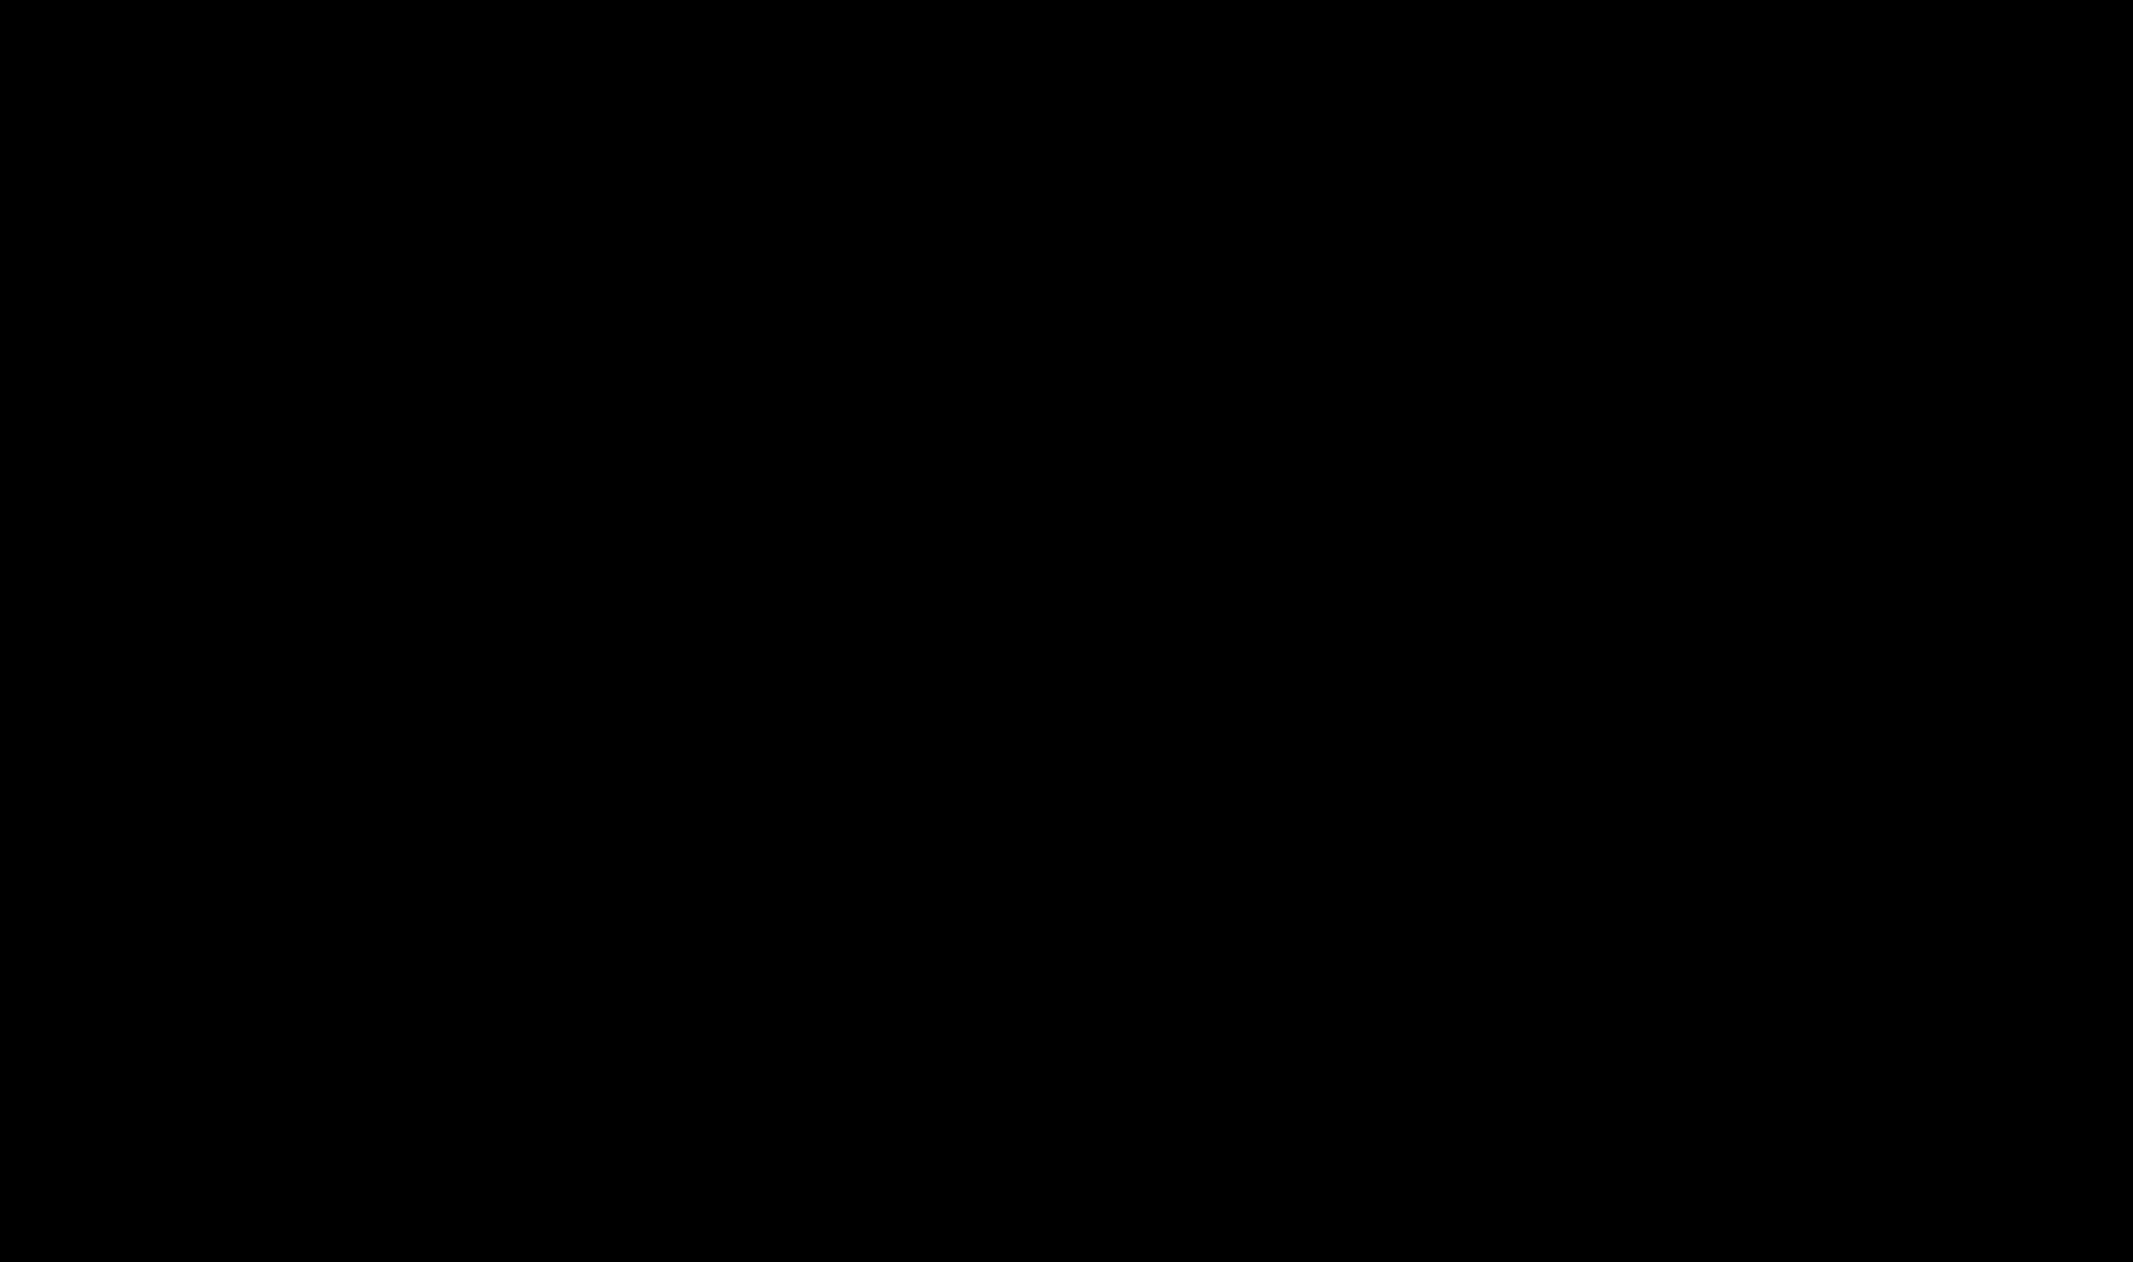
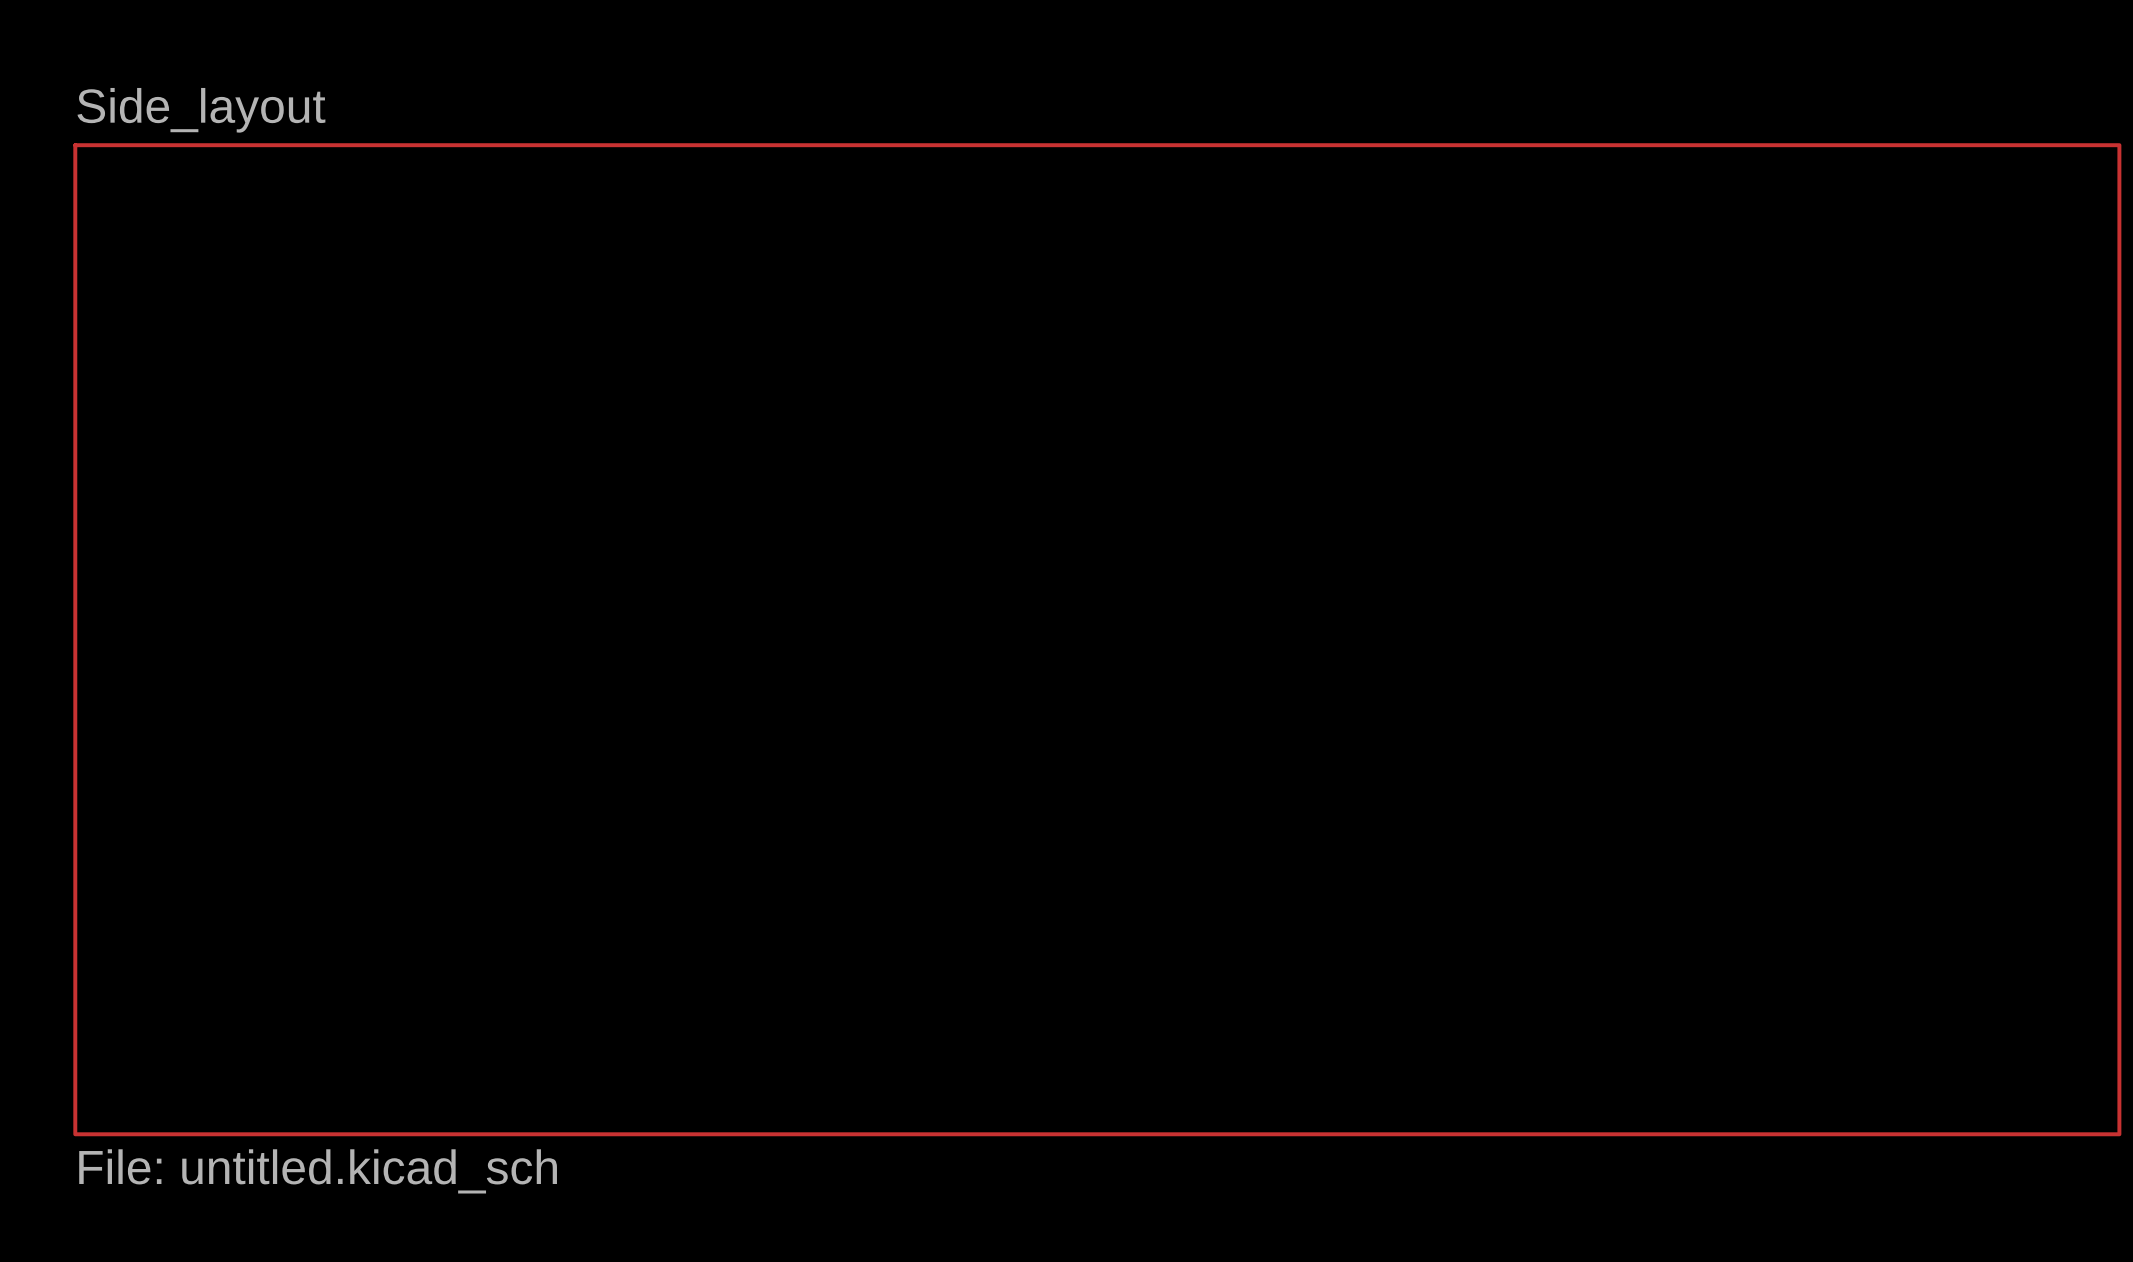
sheet Side_layout: none -> File: untitled.kicad_sch (1097, 639)

